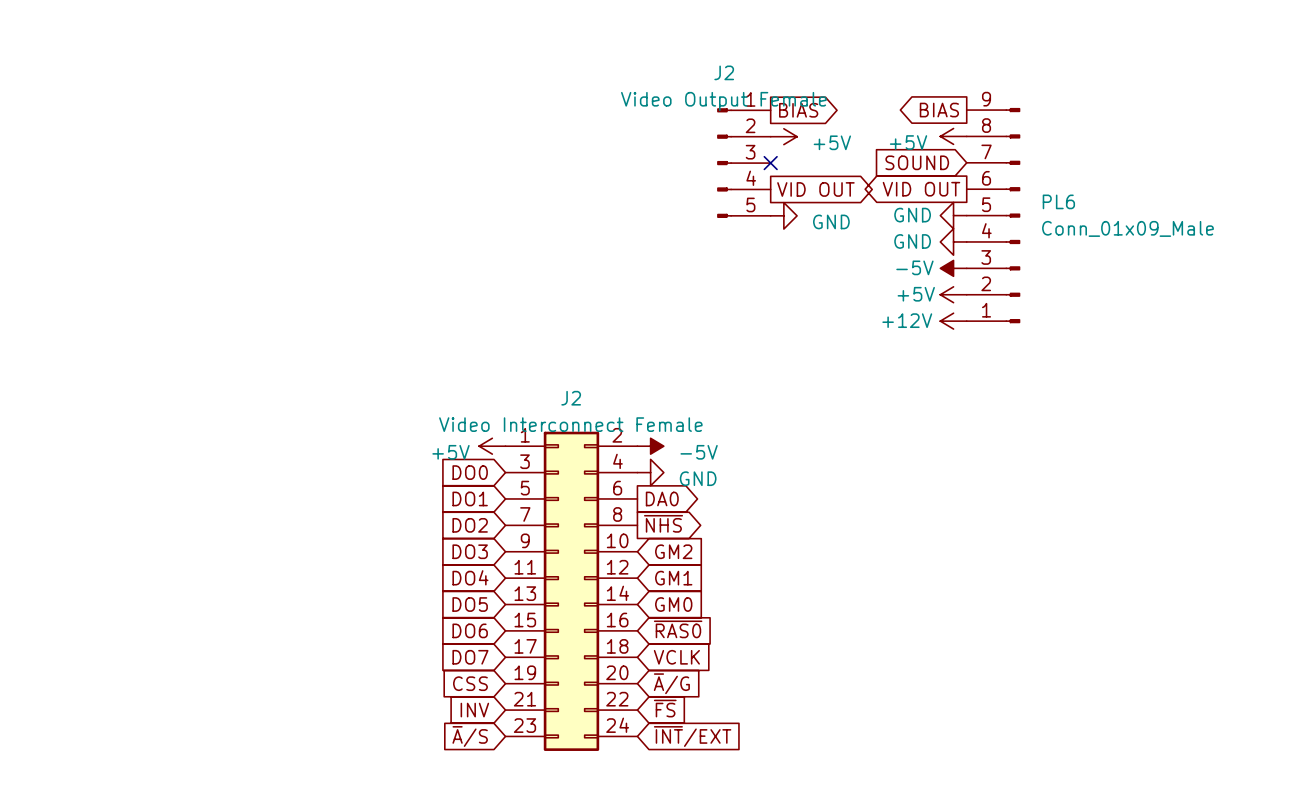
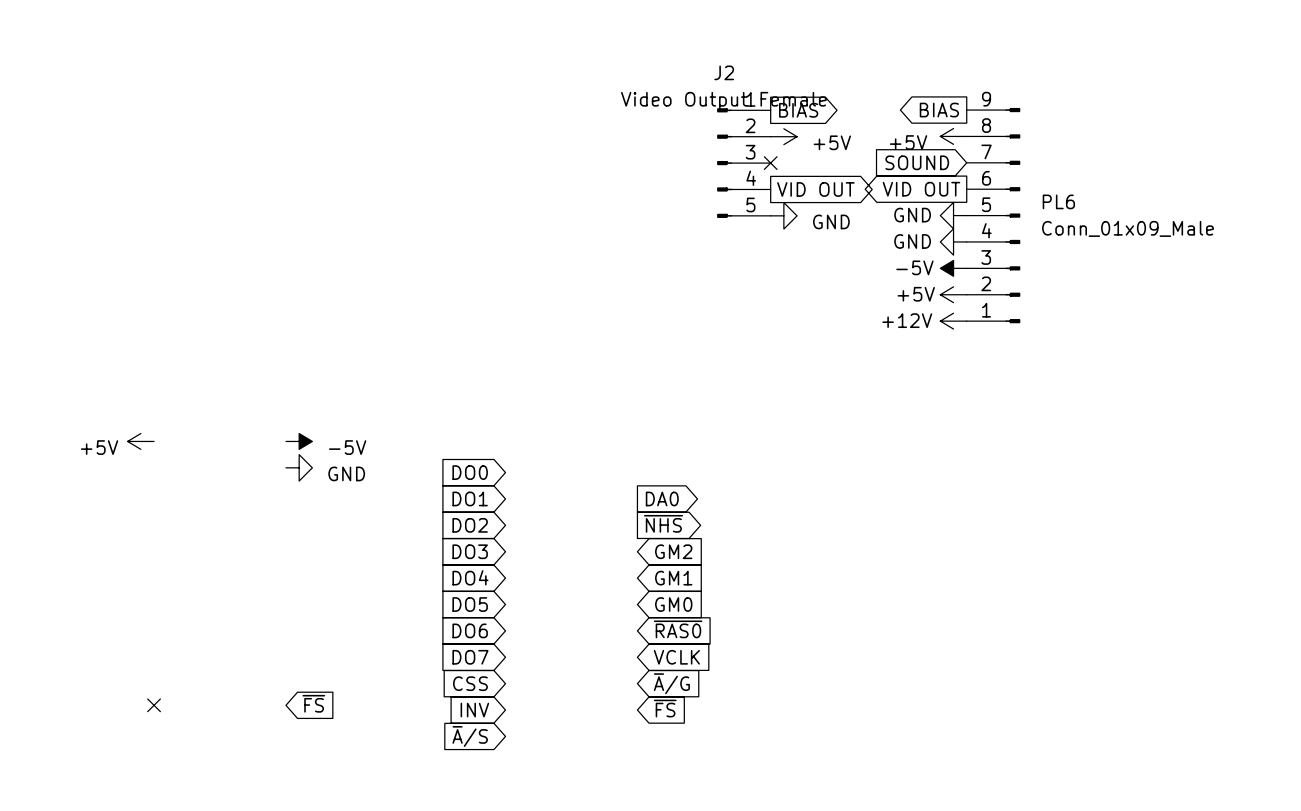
power symbol: none -> +5V (140, 441)
power symbol: none -> -5V (299, 441)
power symbol: +5V (492, 446) -> none
power symbol: -5V (650, 446) -> none
power symbol: none -> GND (299, 467)
power symbol: GND (650, 472) -> none
J2: Video Interconnect Female (571, 591) -> none
global label: none -> ~{FS} (313, 703)
no-connect mark: none -> (154, 705)
global label: ~{INT}/EXT (692, 736) -> none

